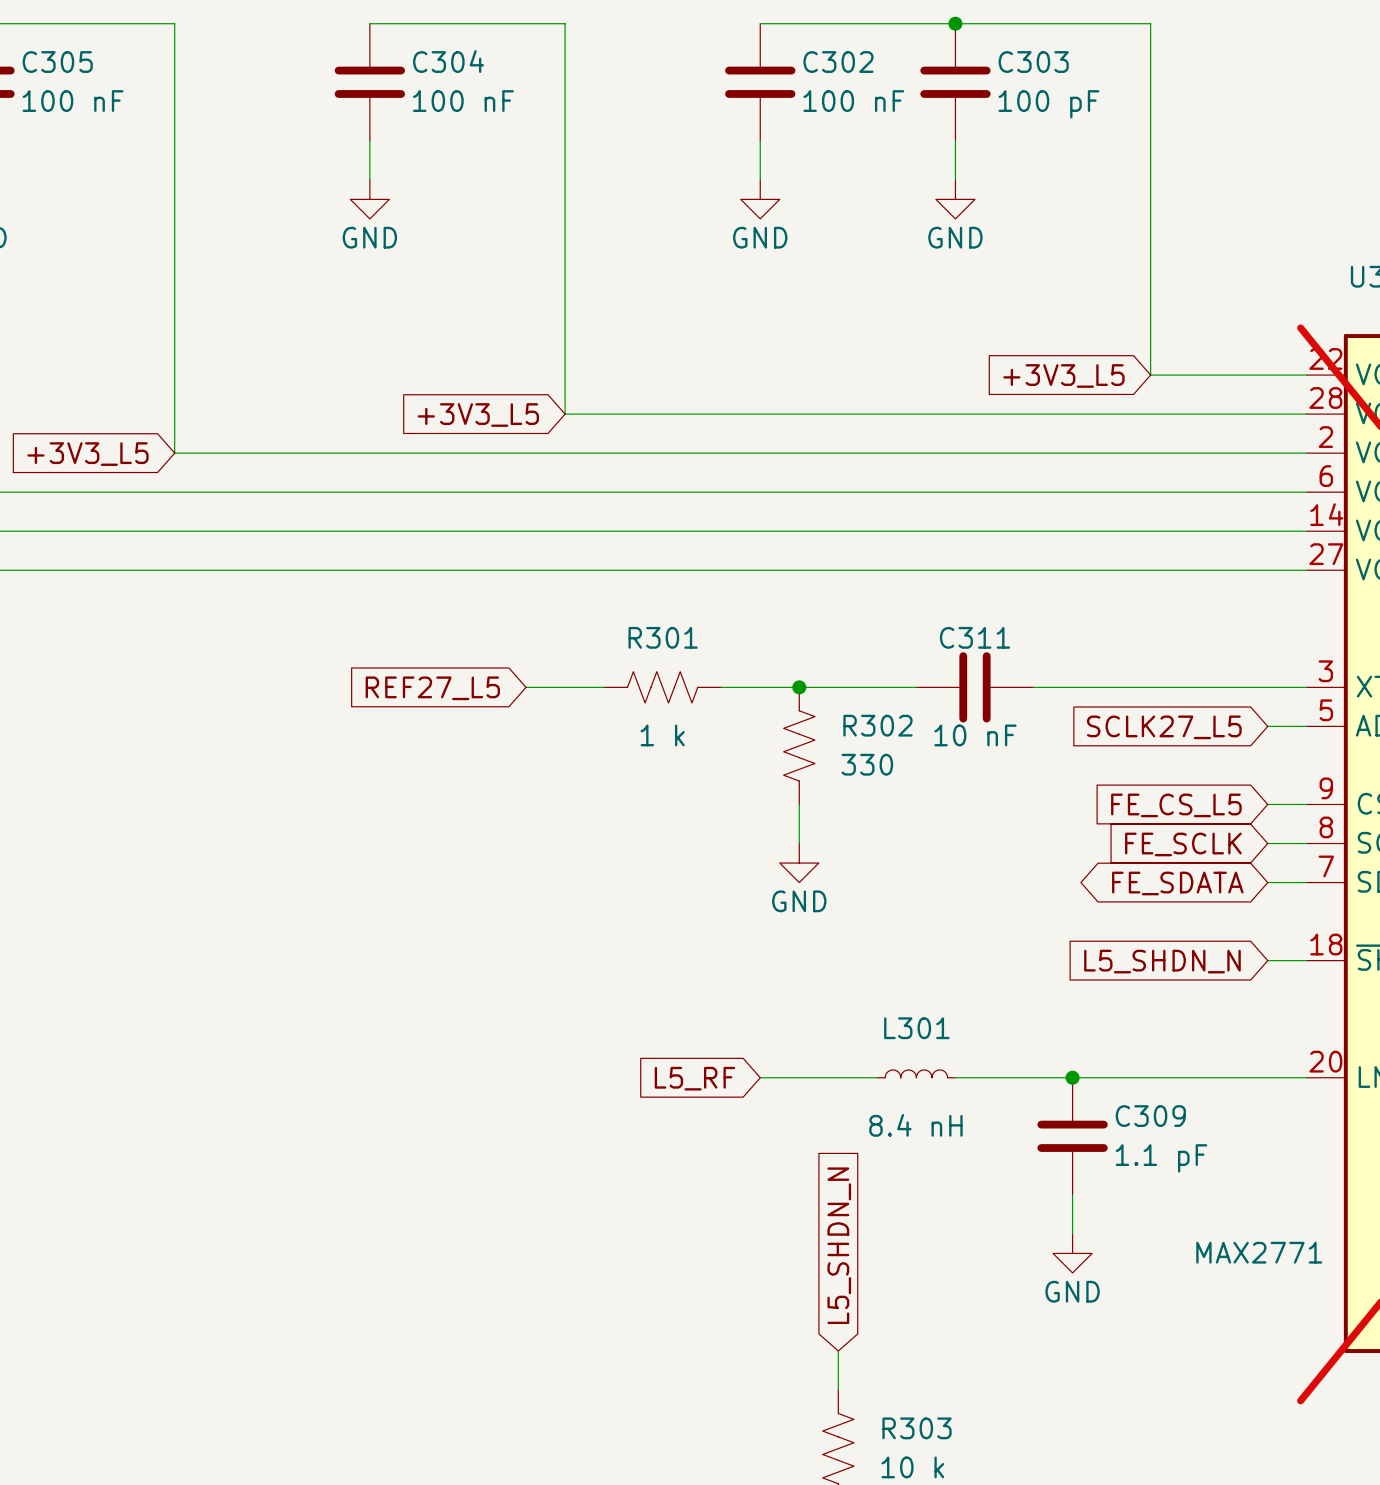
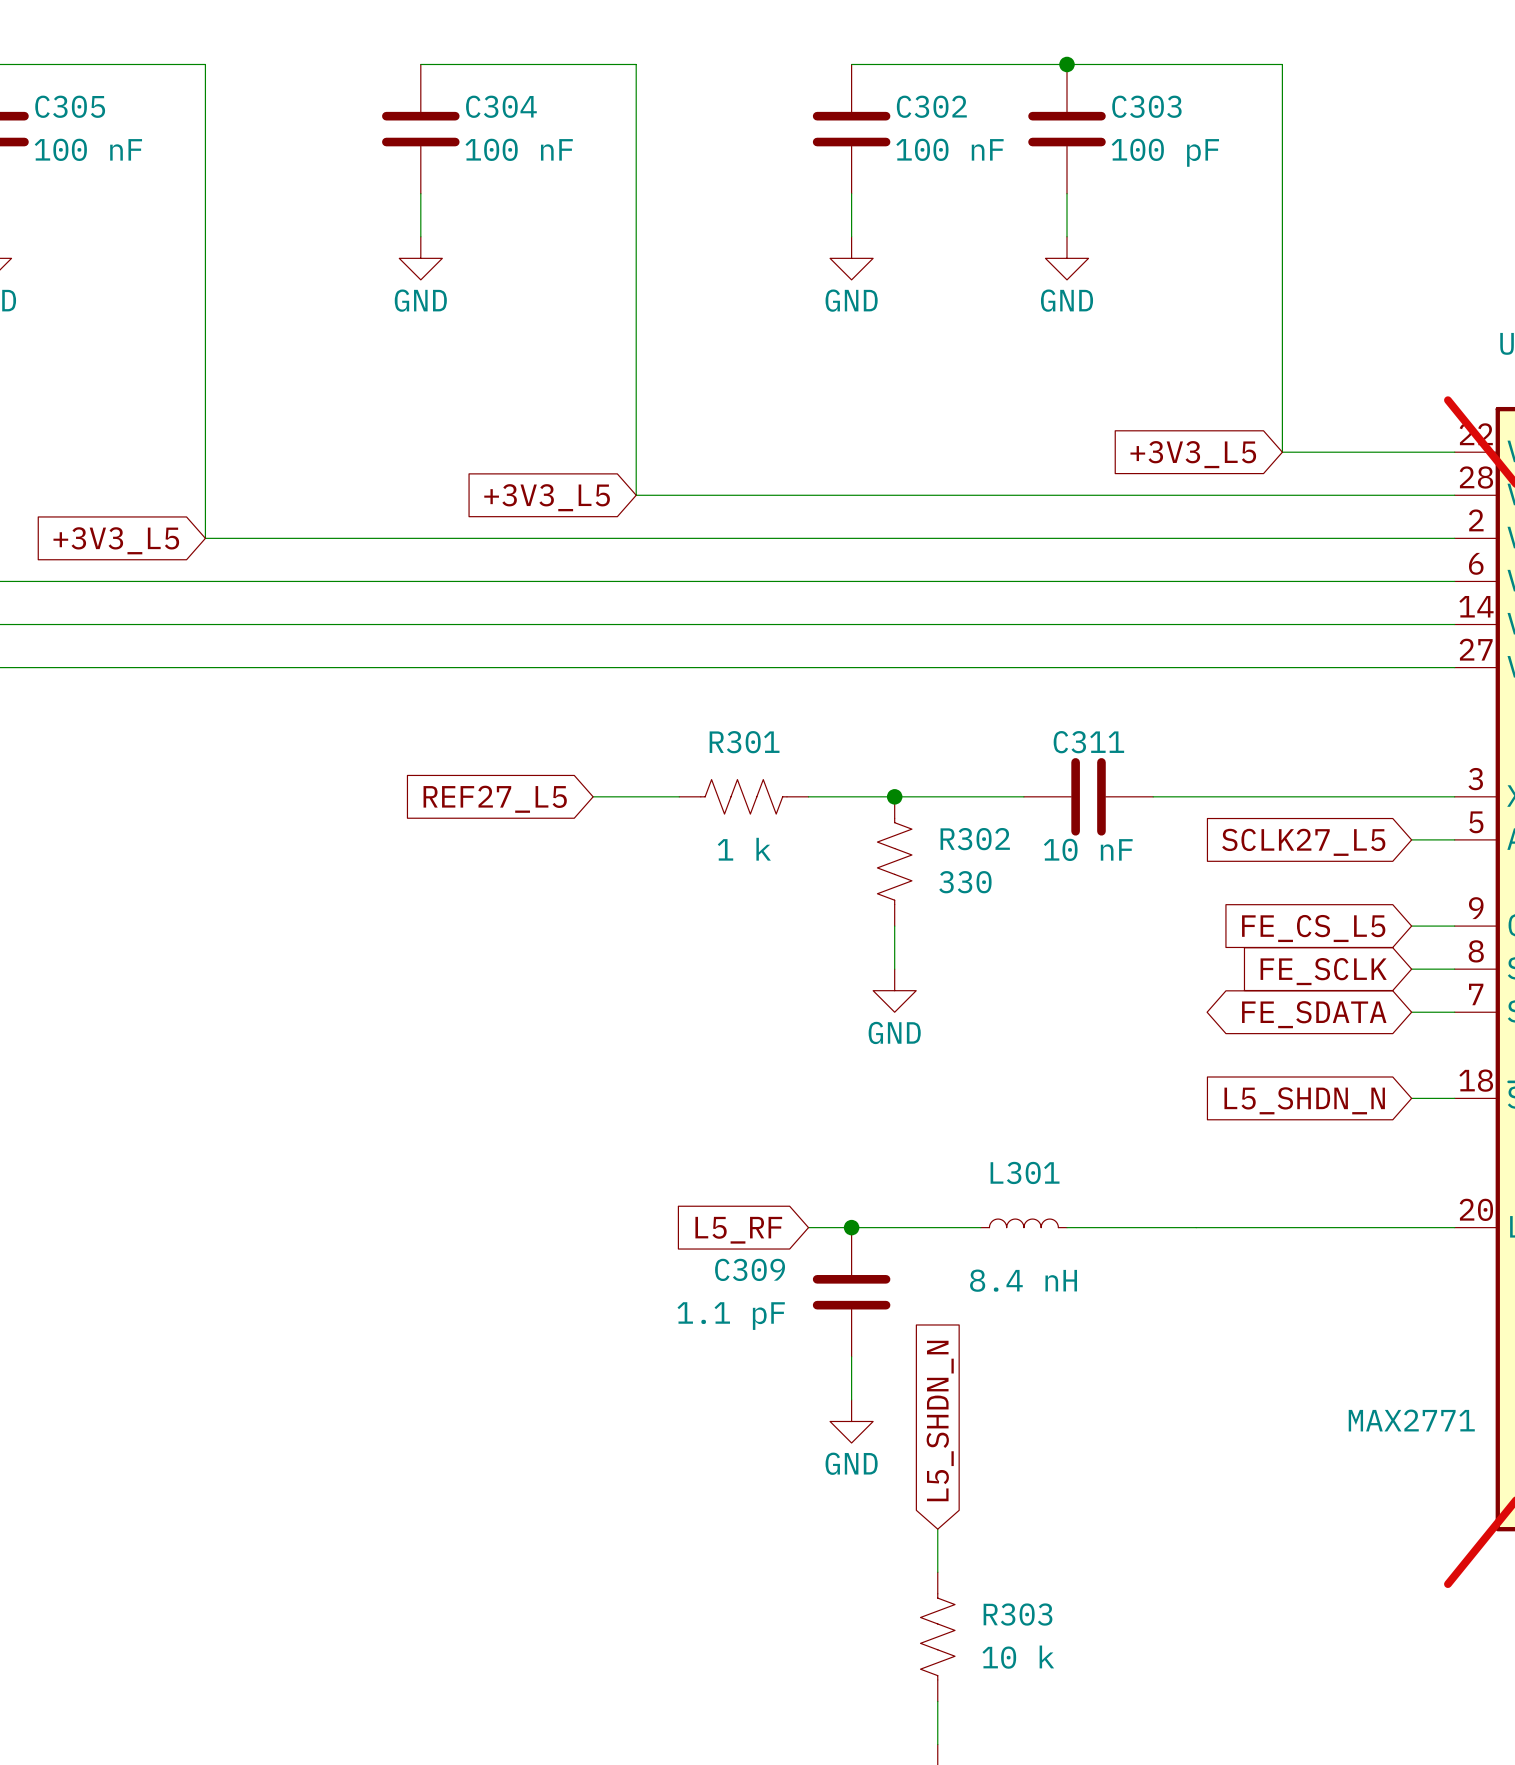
wire: none -> (808, 1227) (851, 1227)
junction: none -> (851, 1227)
junction: (1072, 1077) -> none
global label position: L5_RF (694, 1078) -> L5_RF (738, 1230)
C309 name position: C309 (1150, 1116) -> C309 (750, 1269)
C309 position: (1072, 1136) -> (851, 1292)
C309 value position: 1.1 pF (1161, 1158) -> 1.1 pF (731, 1316)
wire: (1072, 1194) (1072, 1233) -> (851, 1356) (851, 1399)
power symbol position: GND (1072, 1253) -> GND (851, 1421)

